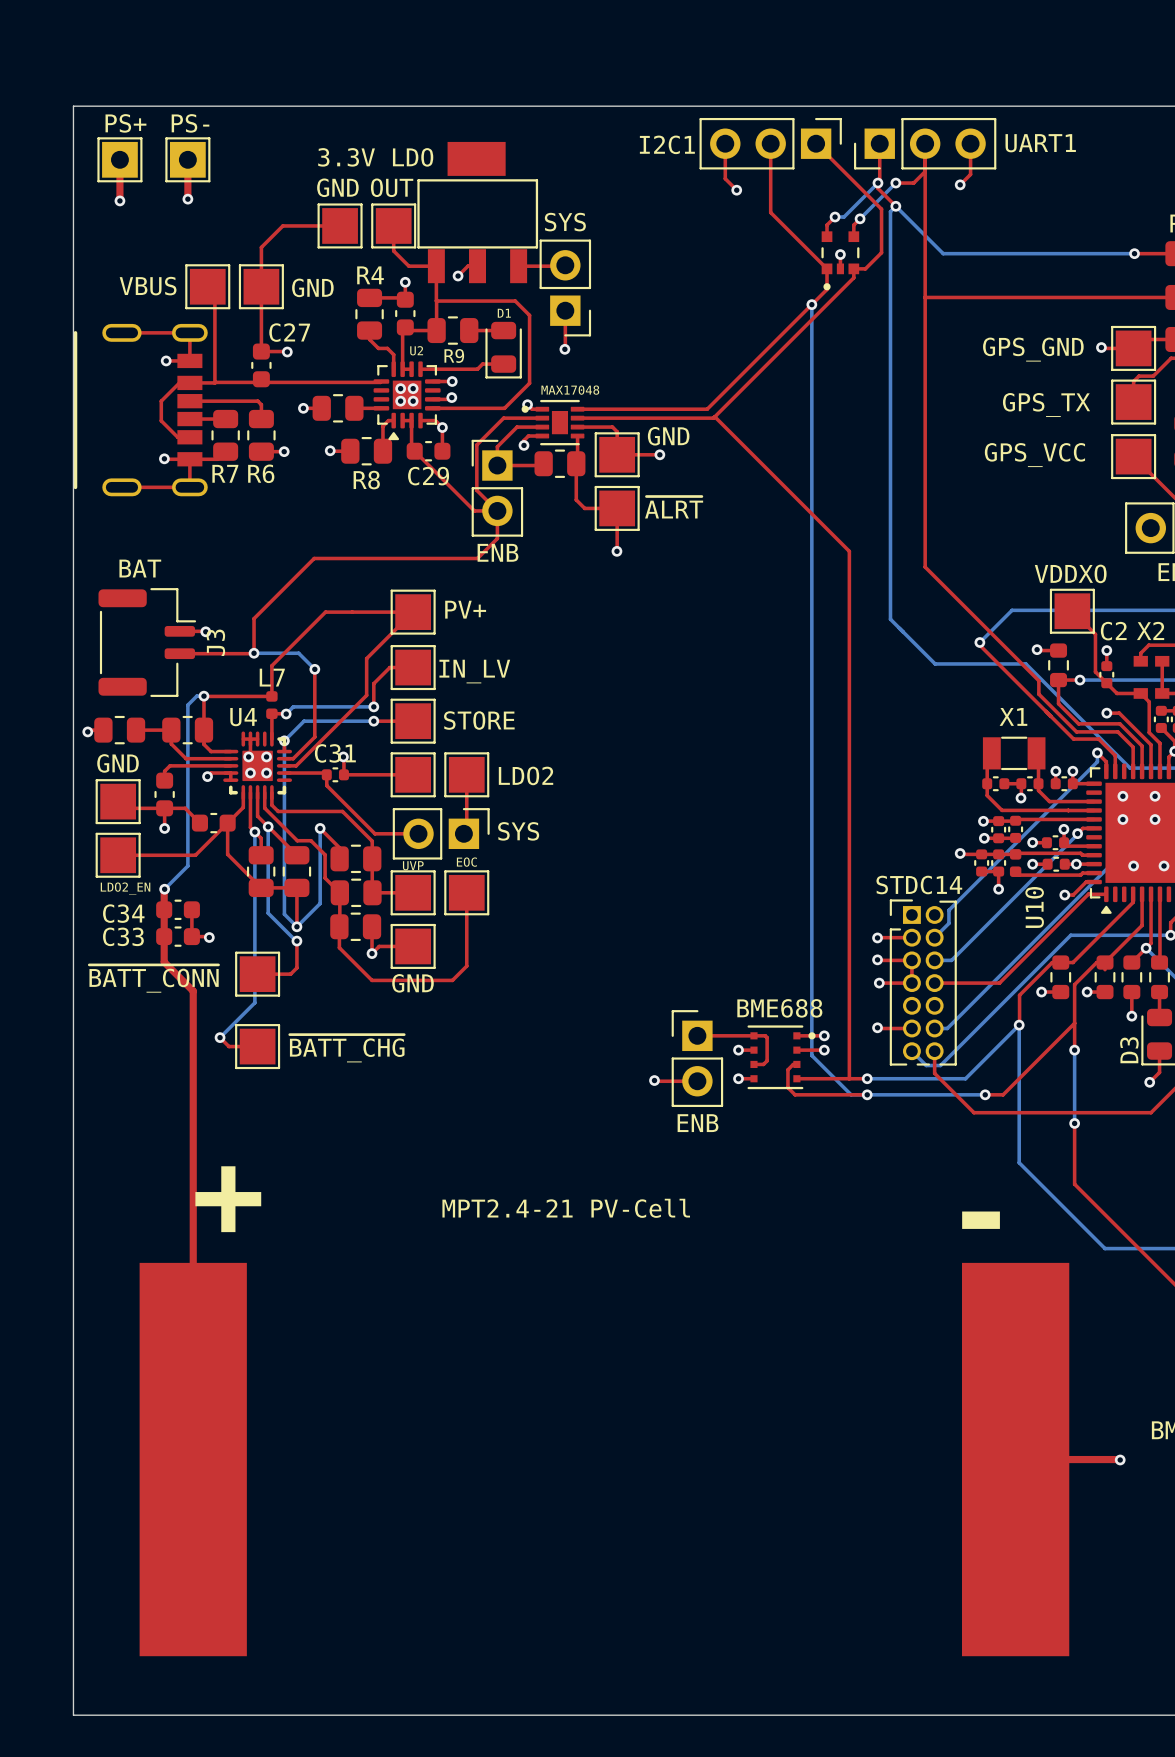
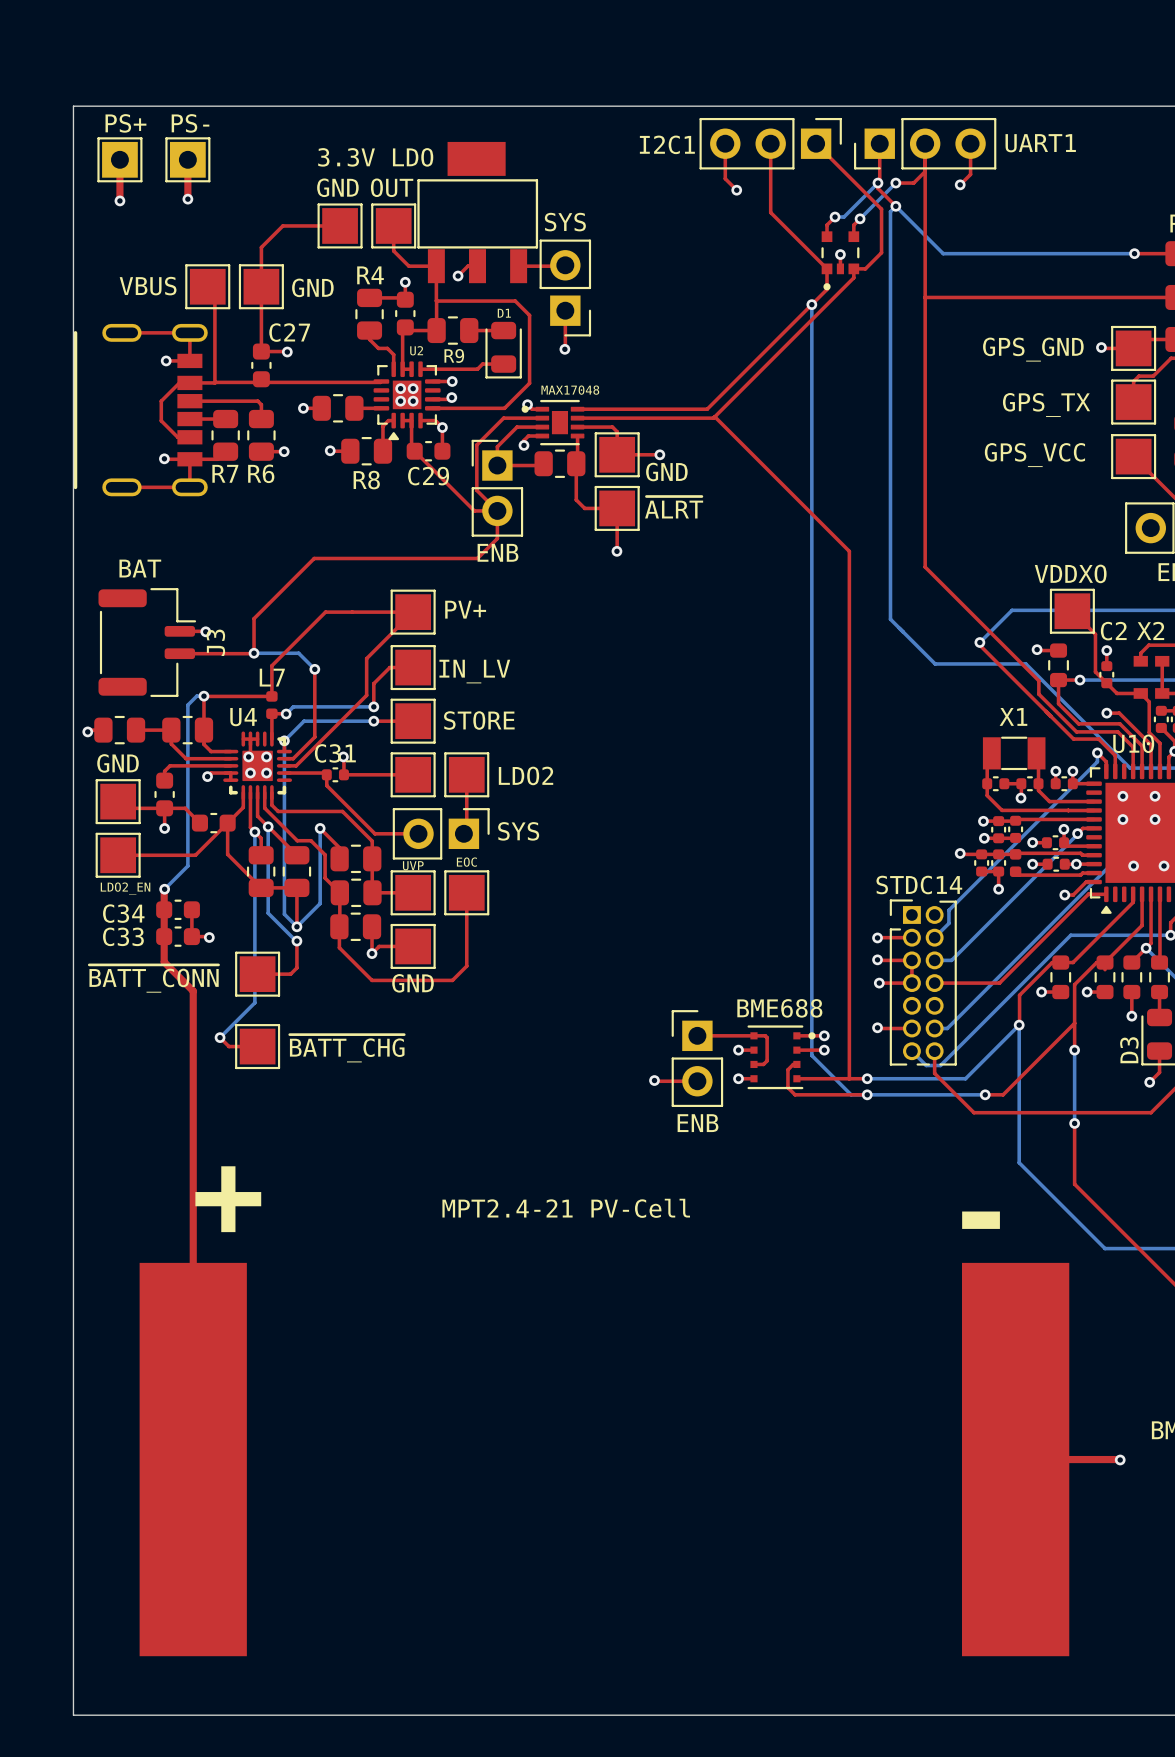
part value position: GND (668, 436) -> GND (666, 472)
U10 name rotation: 0° (1034, 907) -> 90° clockwise (1133, 743)
U10 name position: U10 (1034, 907) -> U10 (1133, 743)

